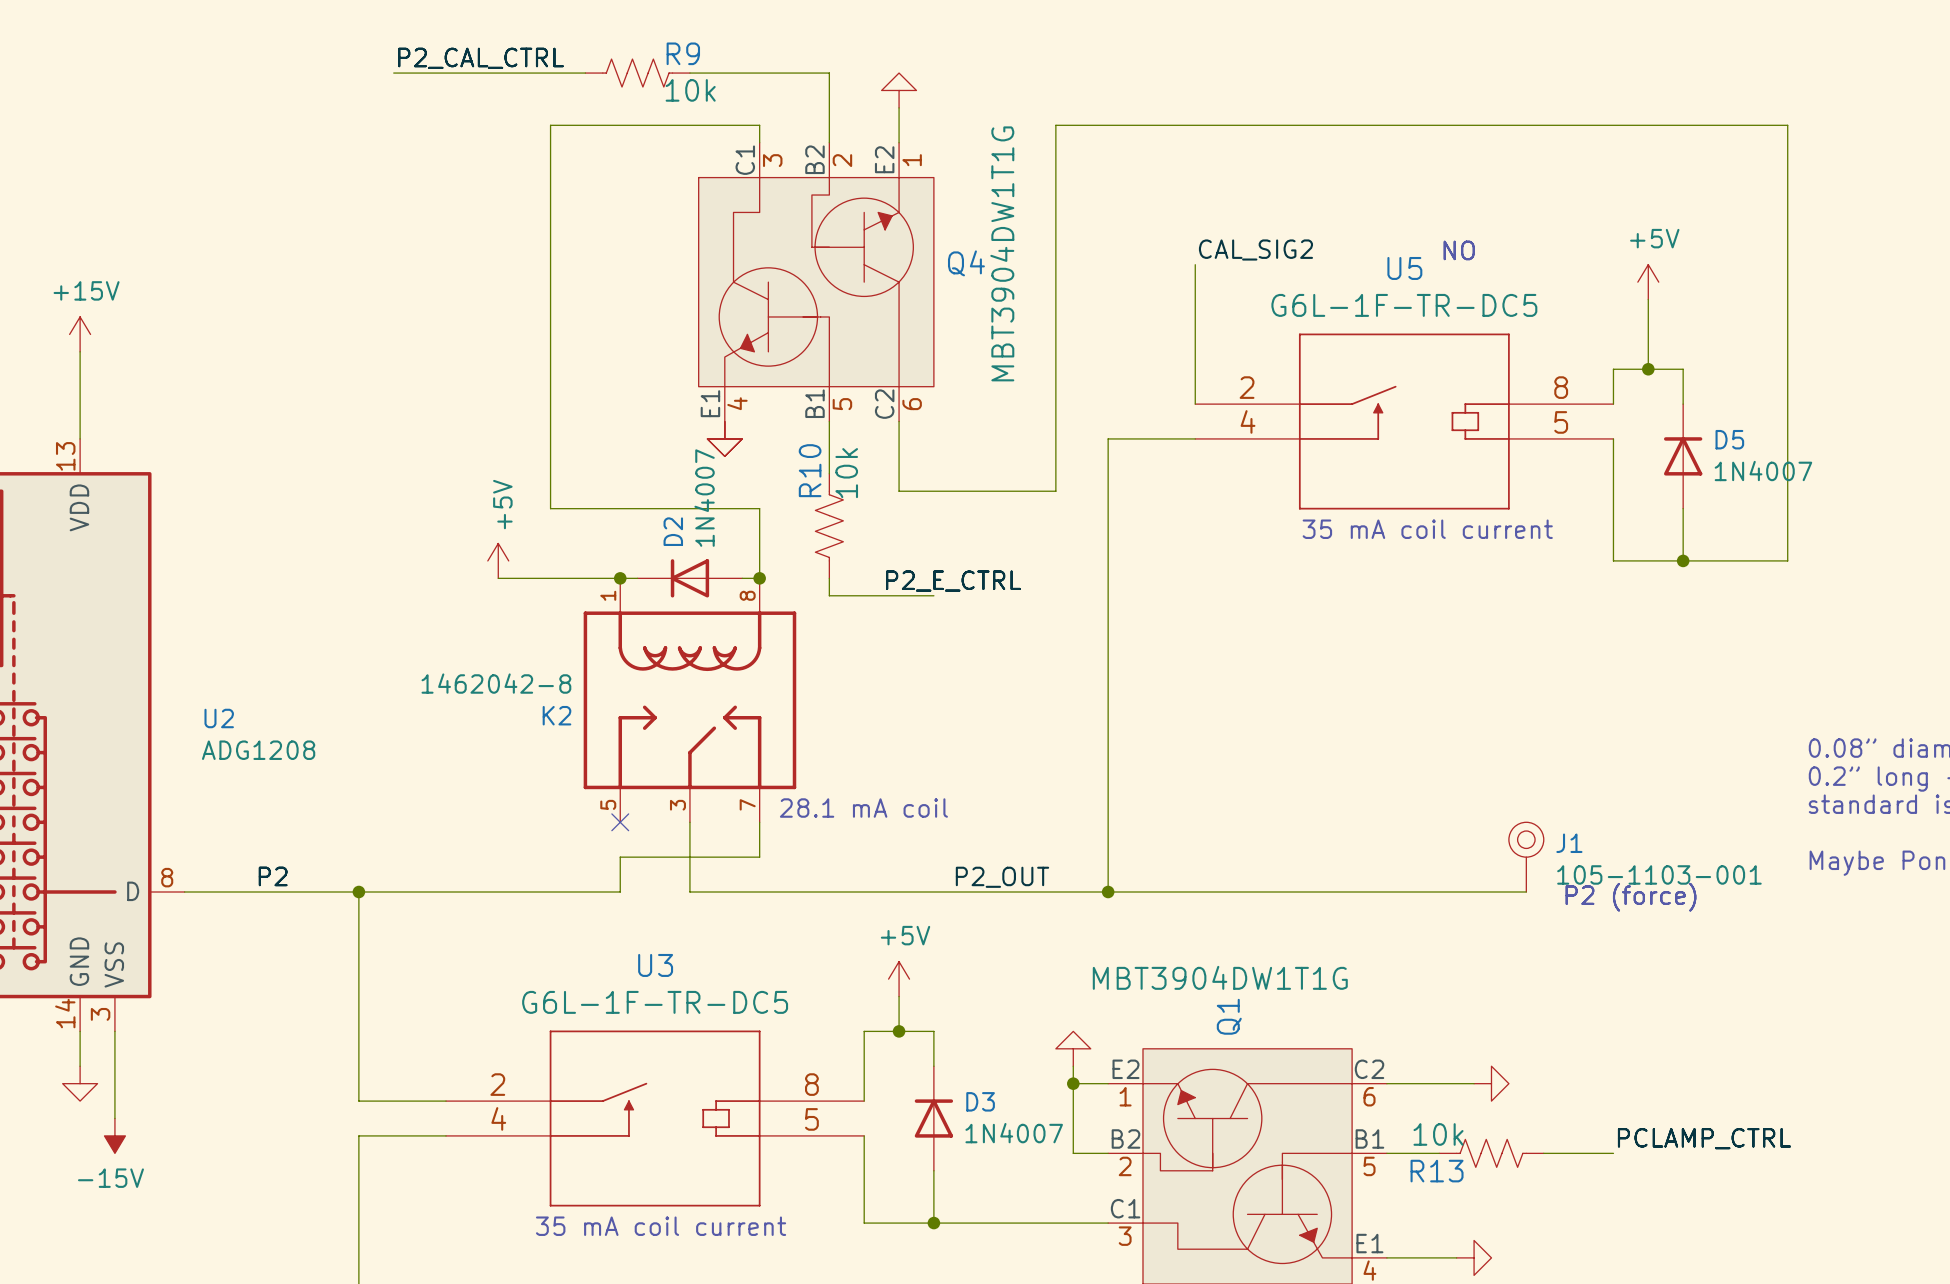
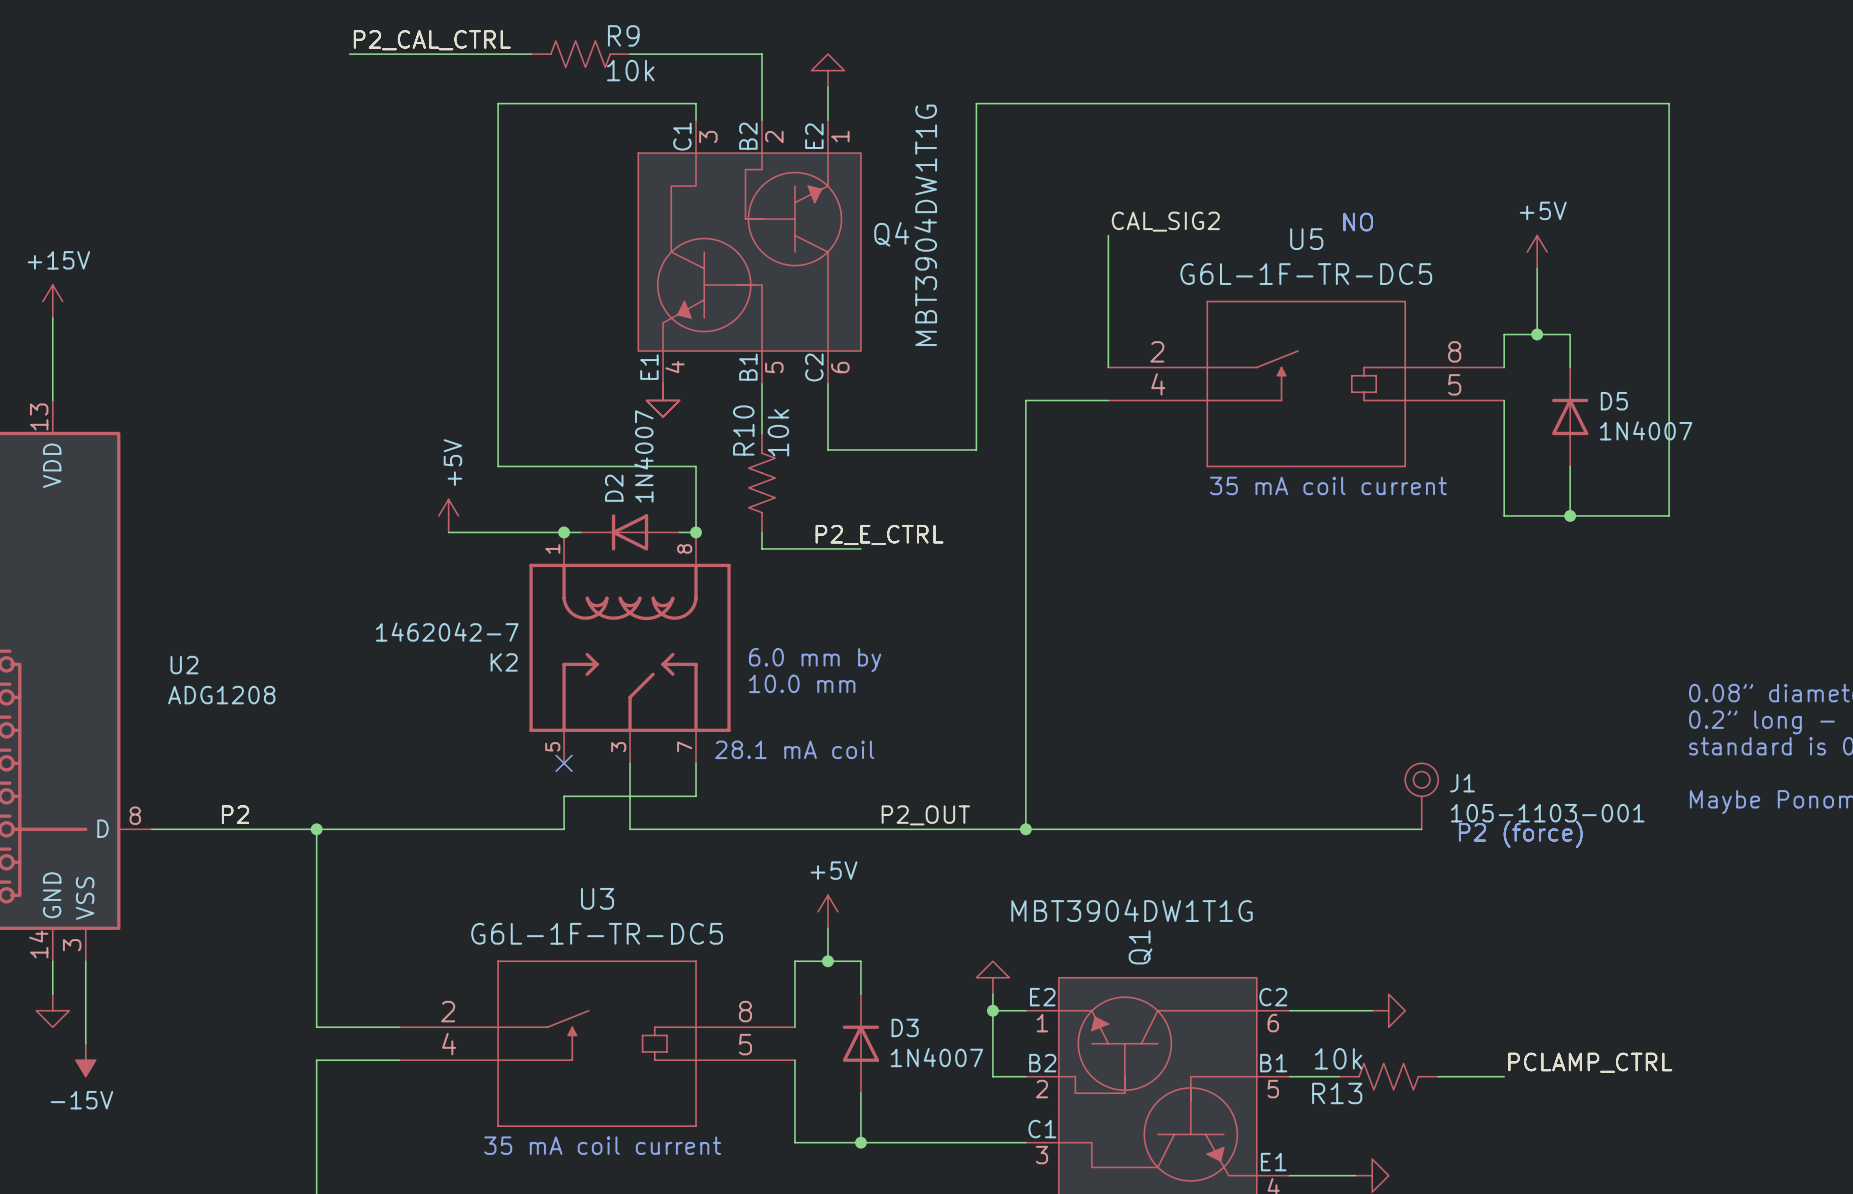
K2 value: 1462042-8 (496, 683) -> 1462042-7 (447, 632)
text: none -> 6.0 mm by (815, 660)
text: none -> 10.0 mm (802, 683)

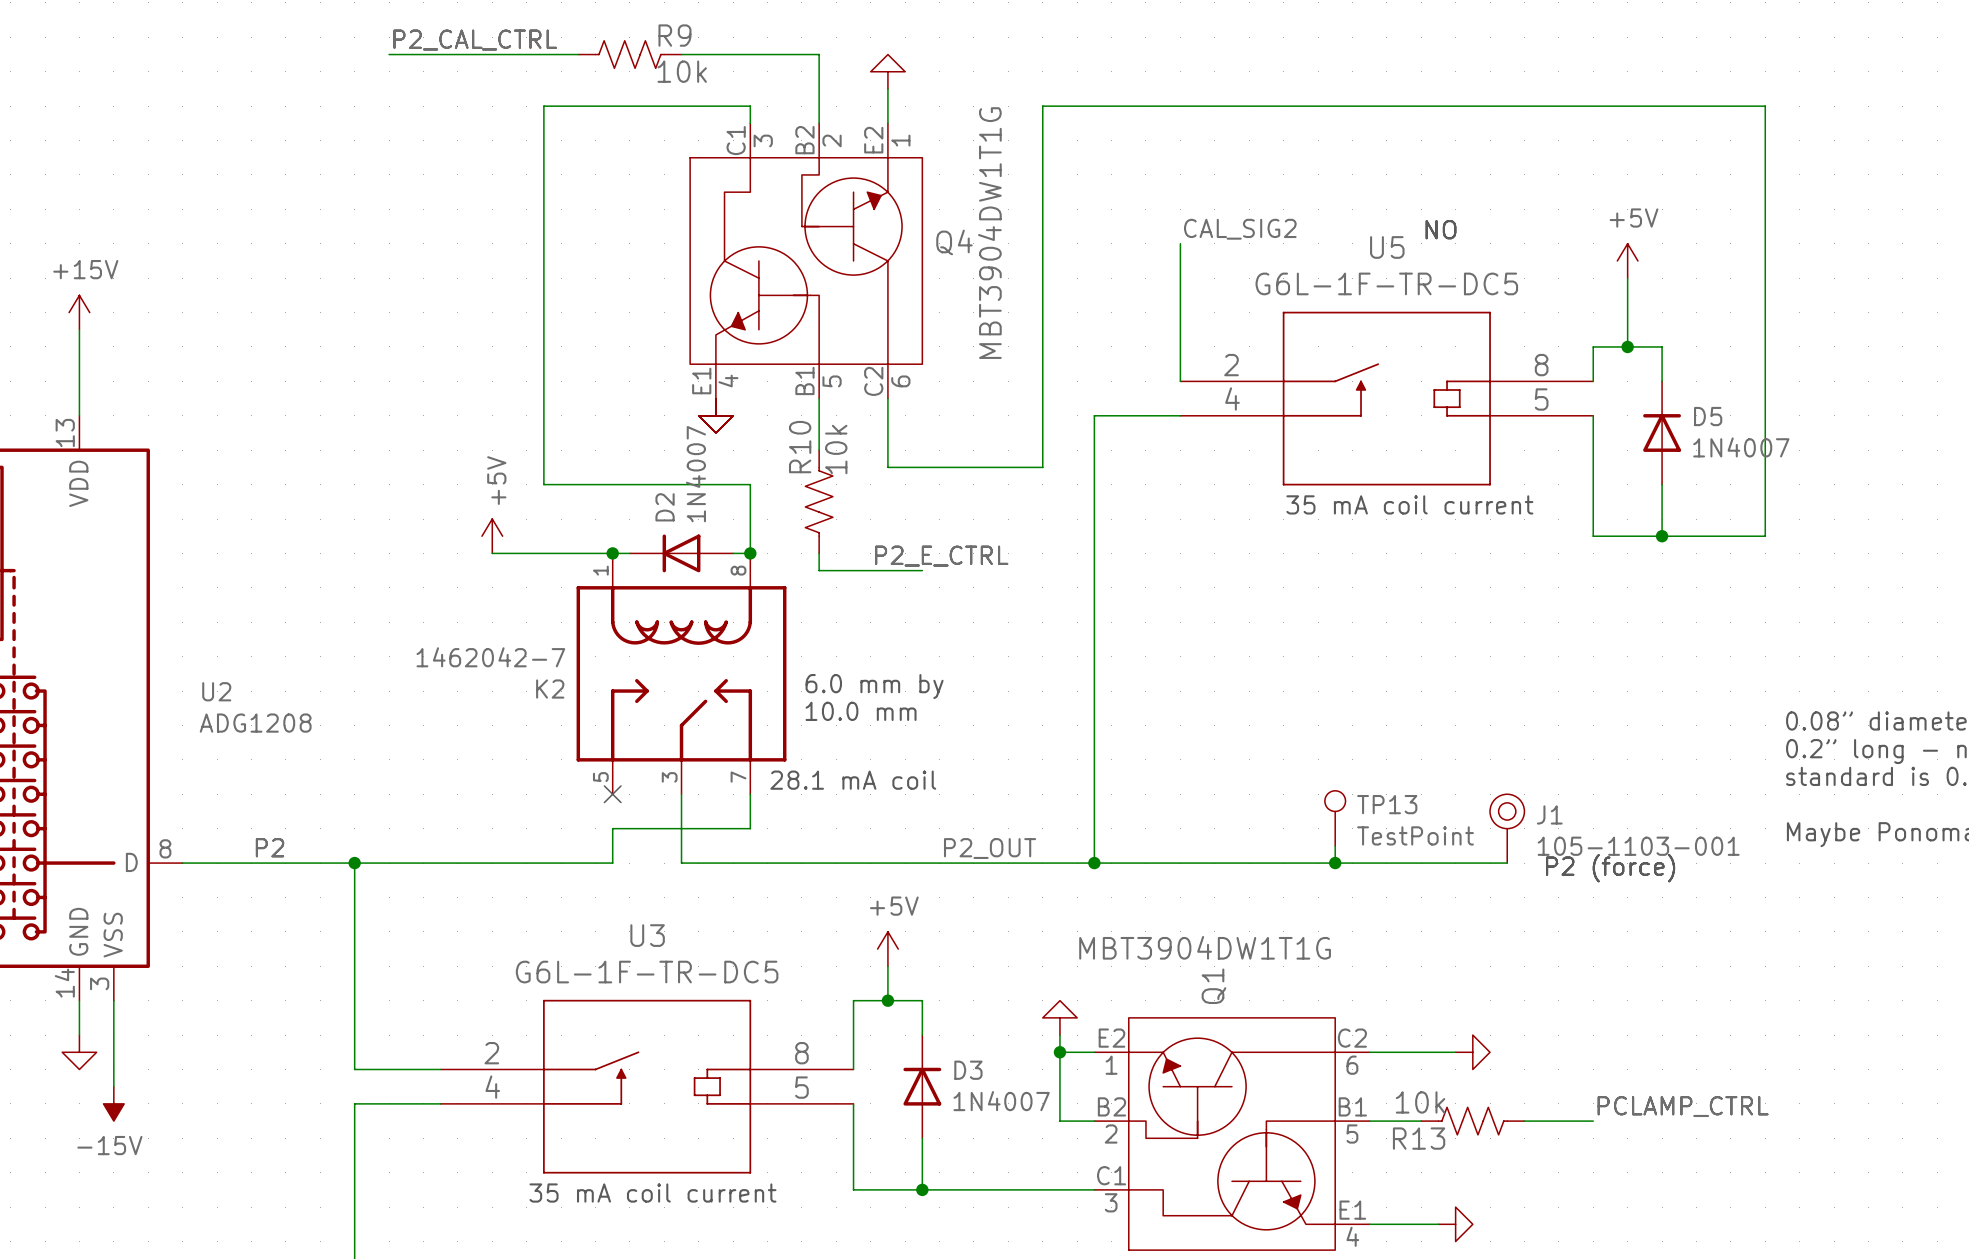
TP13: none -> TestPoint (1335, 818)
wire: none -> (1335, 845) (1335, 863)
junction: none -> (1335, 863)

